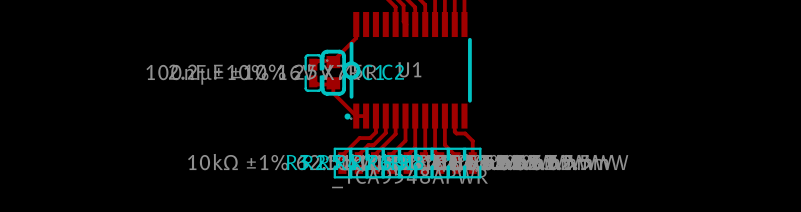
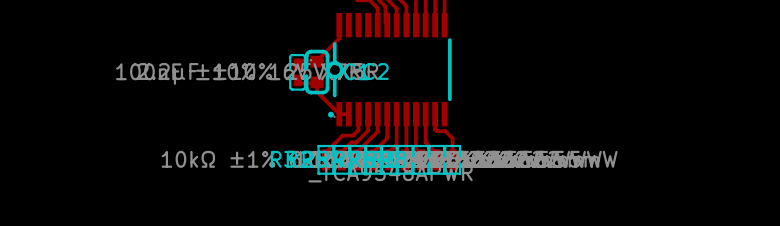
U1 name: U1 (409, 69) -> none

